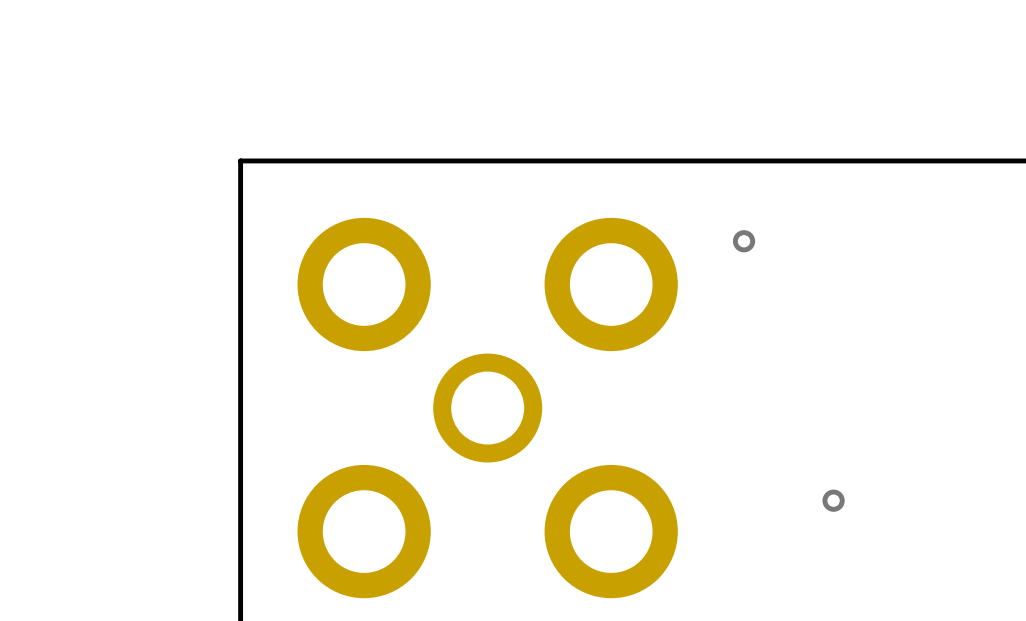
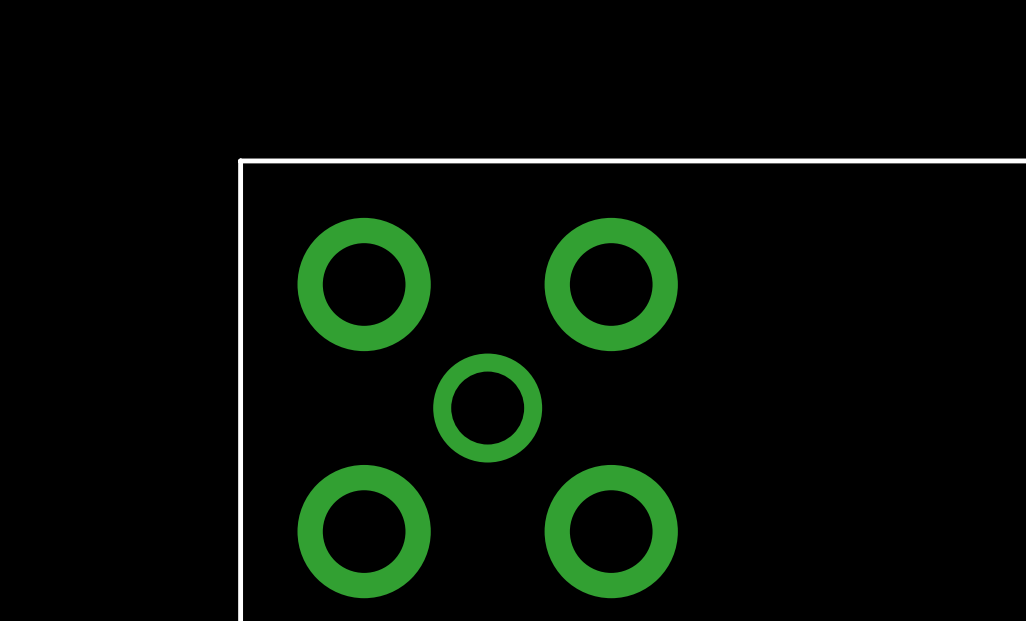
via: (744, 241) -> none
via: (833, 500) -> none

